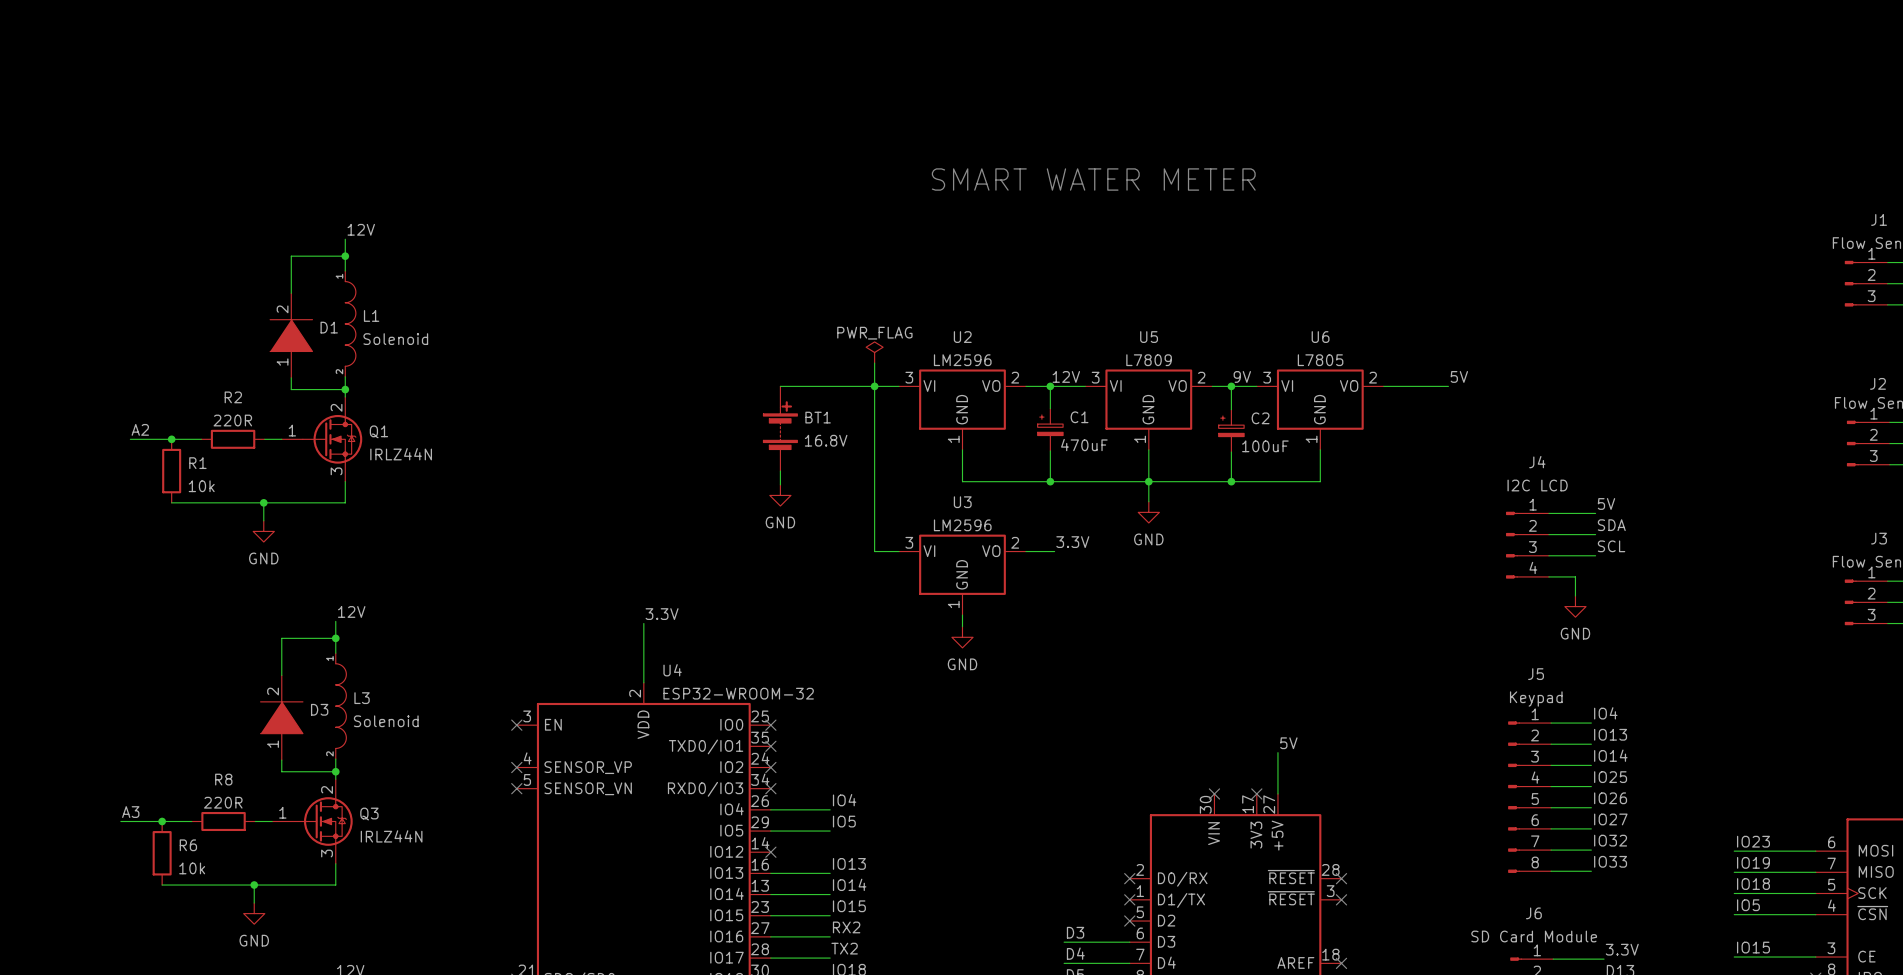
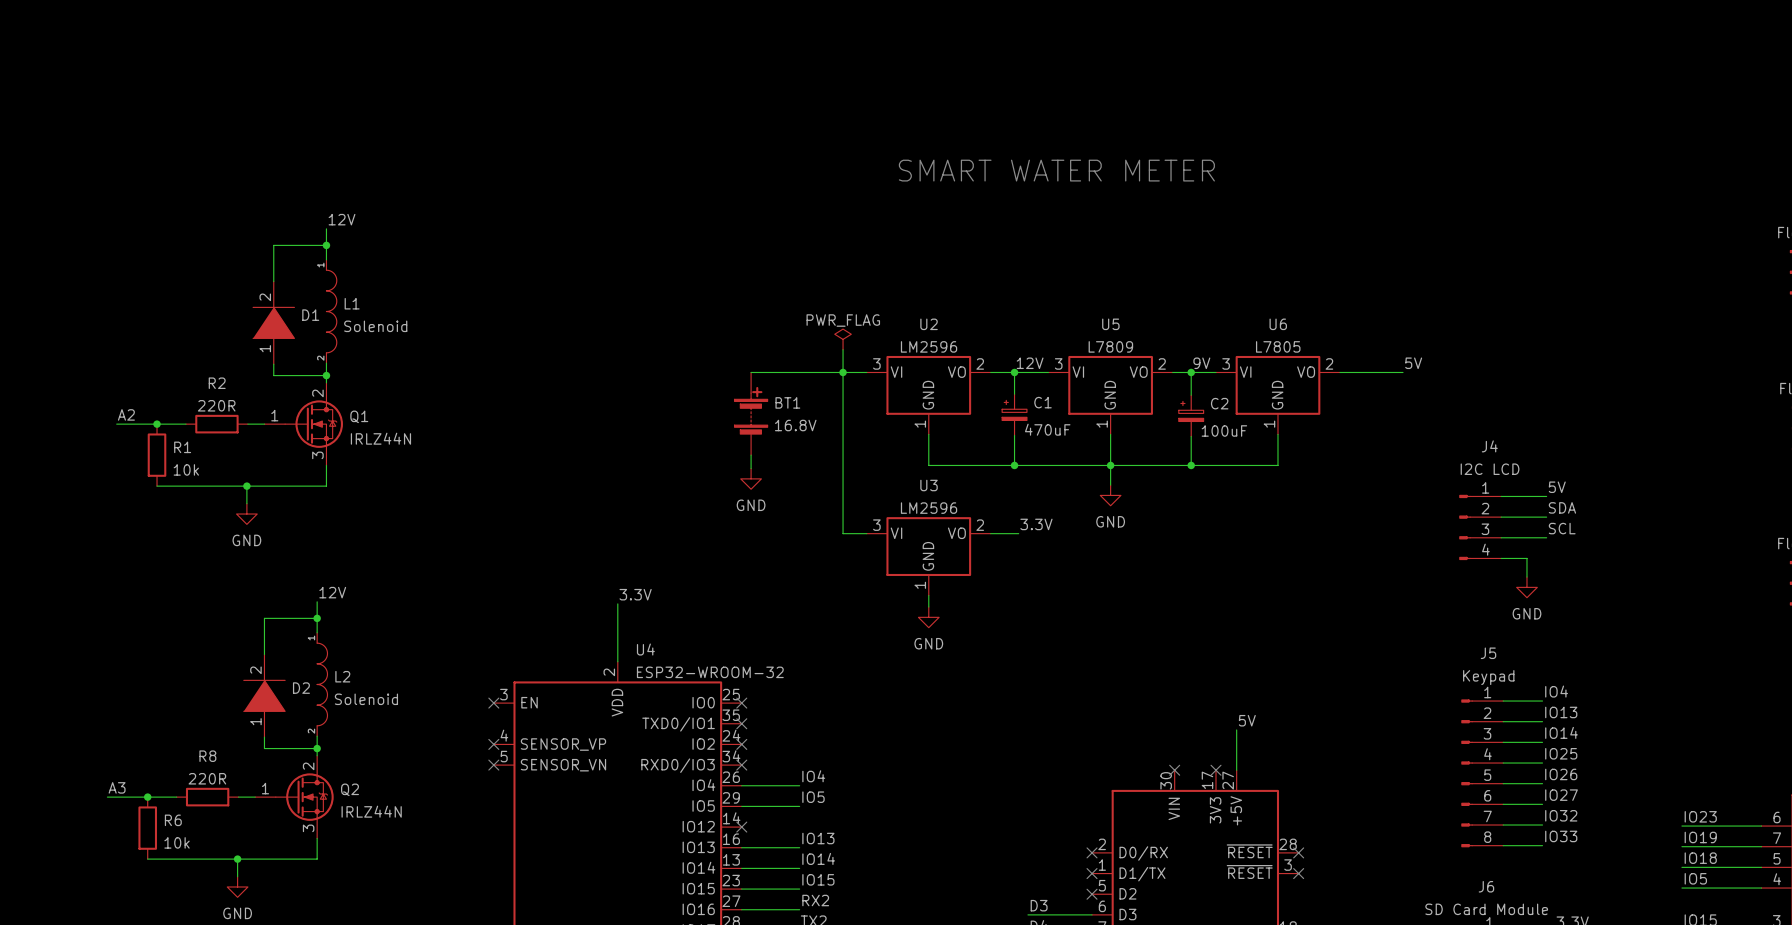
L3 name: L3 (362, 698) -> L2 (342, 676)
D3 name: D3 (319, 709) -> D2 (301, 688)
Q3 name: Q3 (369, 814) -> Q2 (349, 789)

